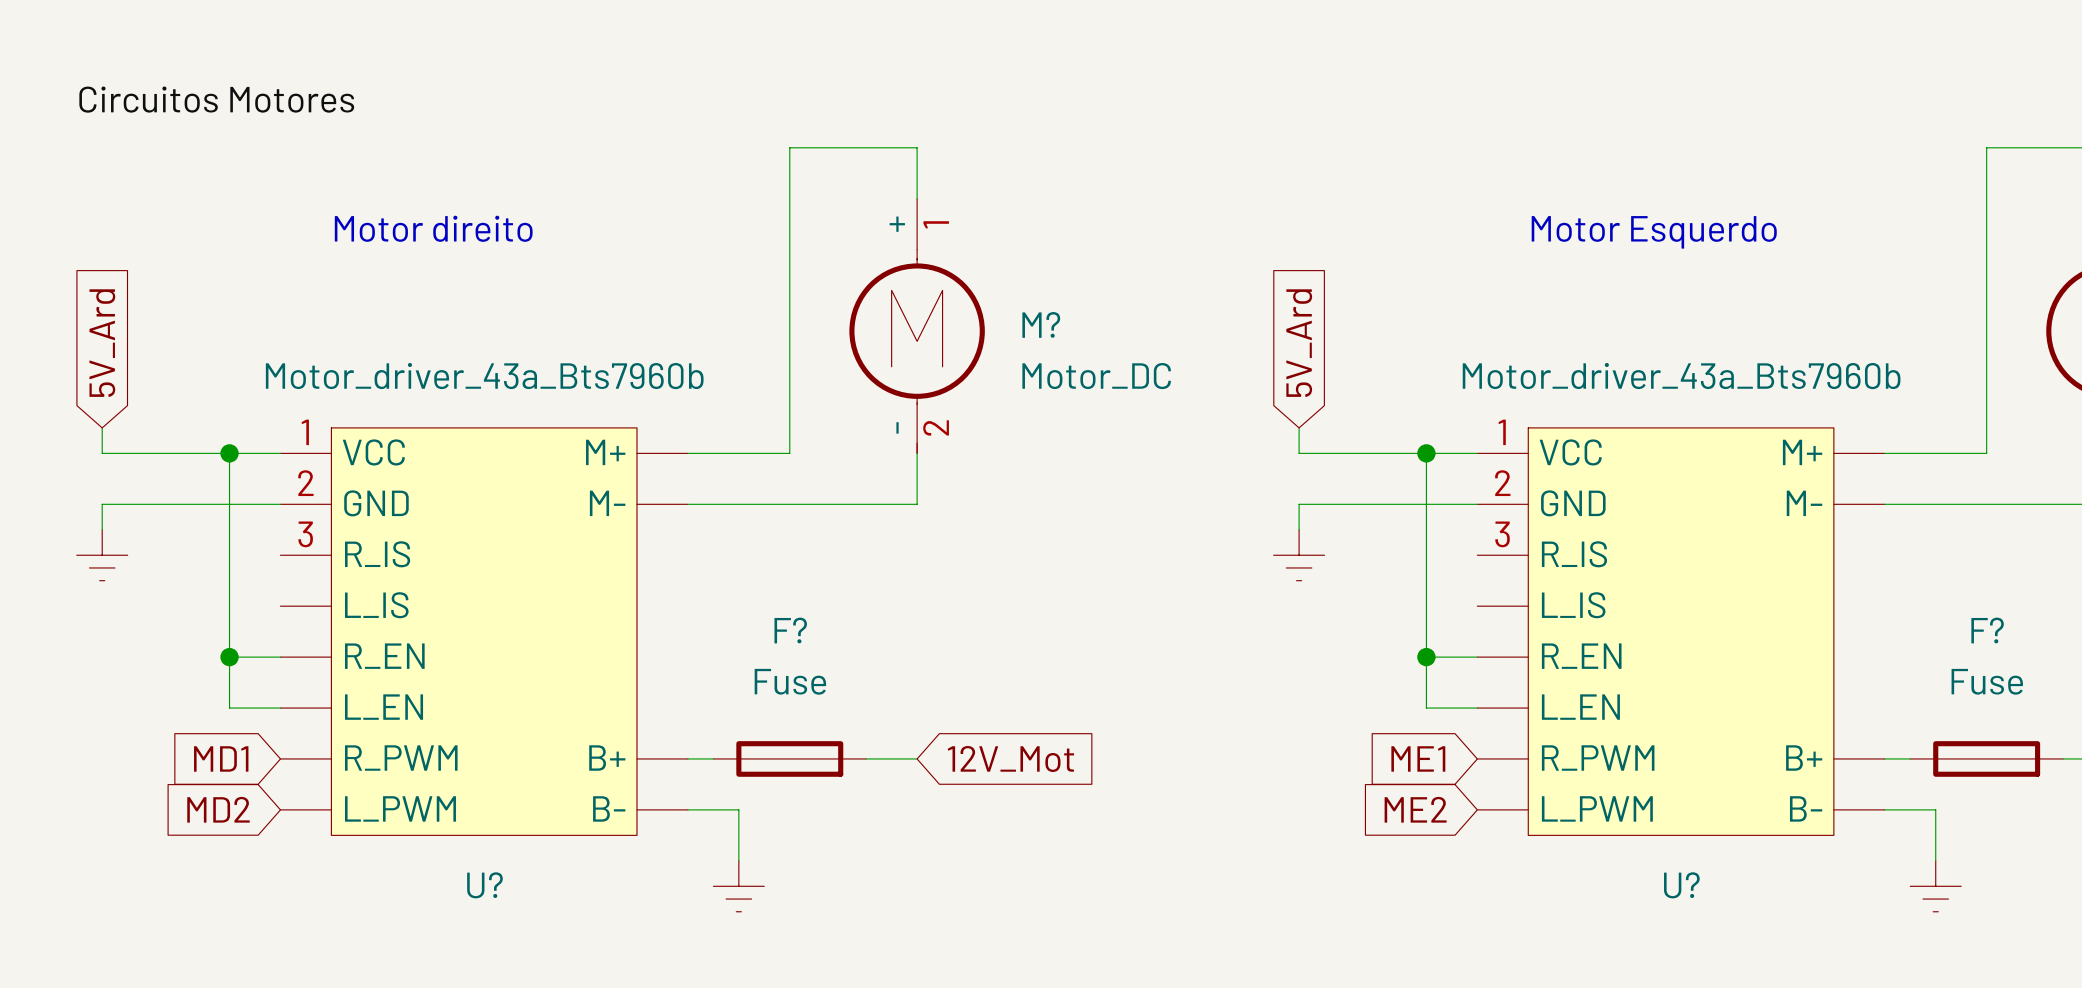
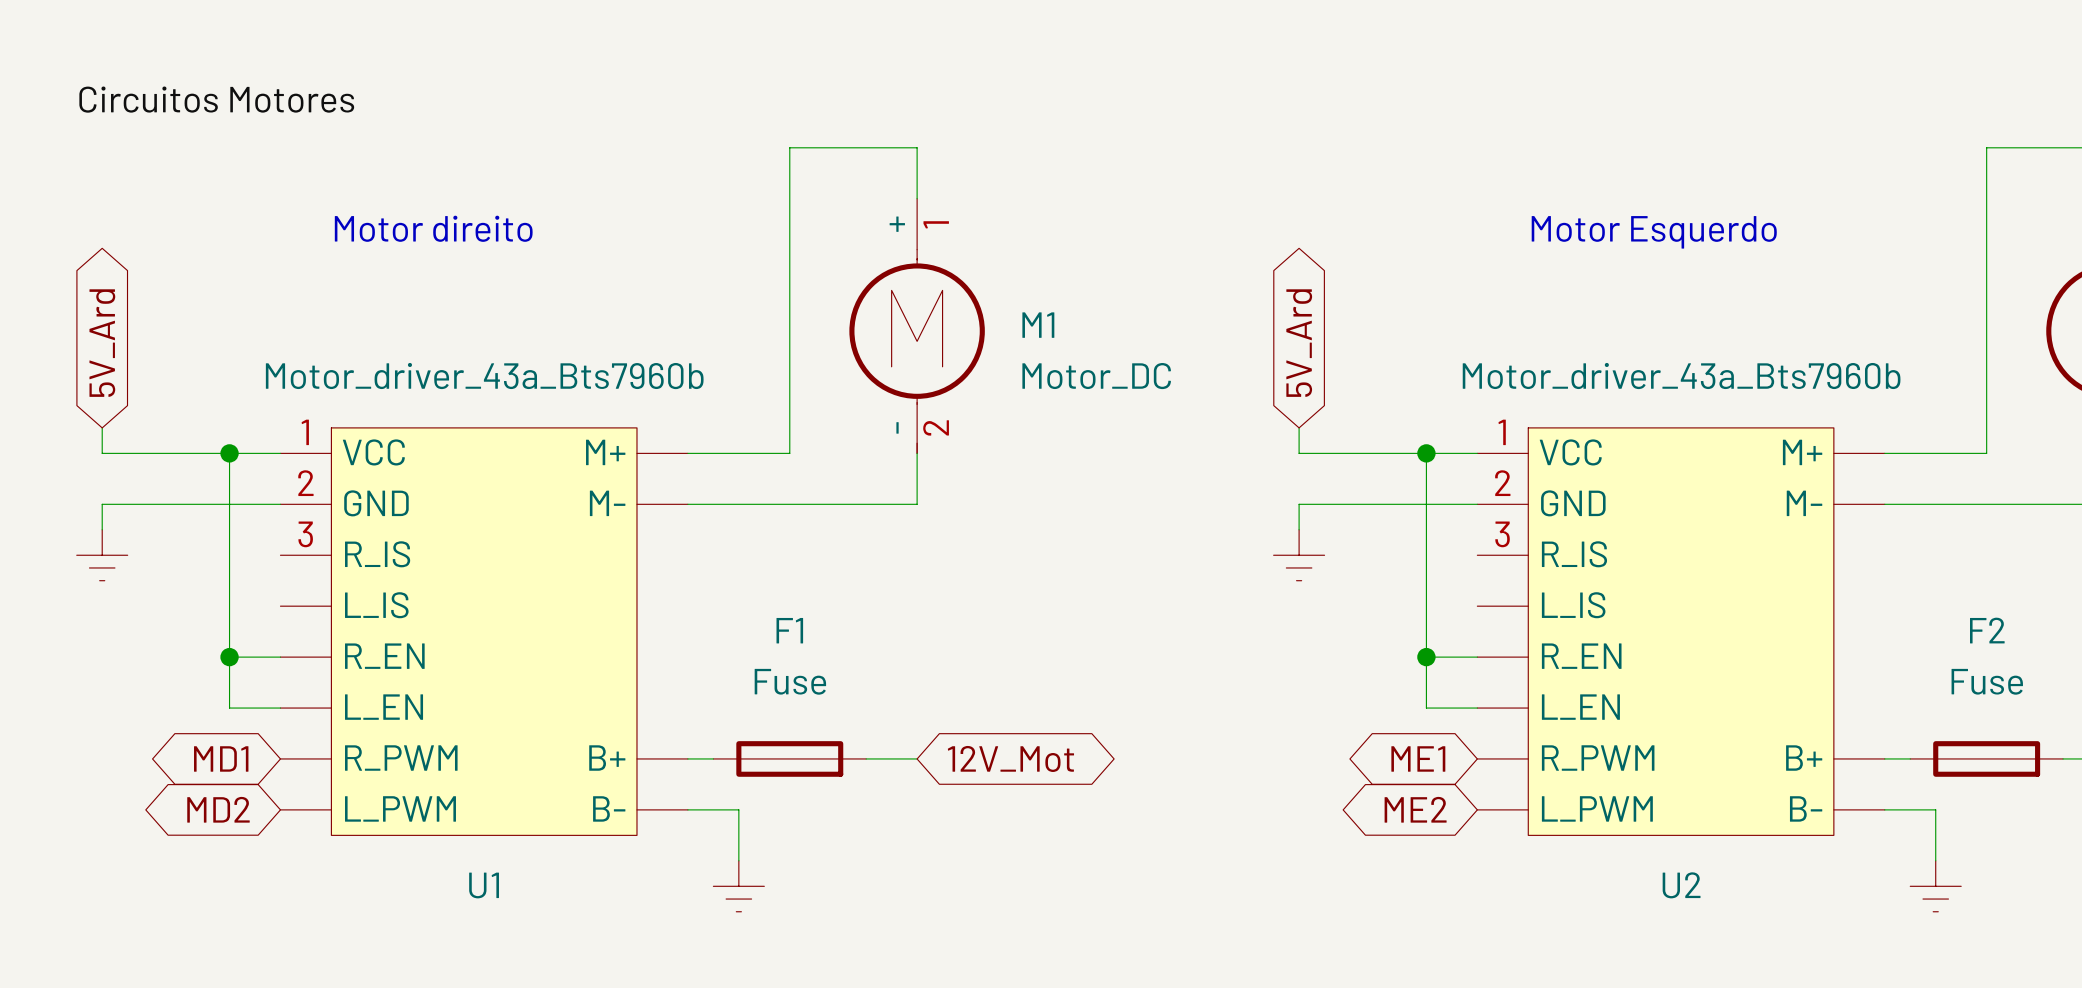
M? name: M? (1041, 324) -> M1 (1038, 325)
global label shape: input (102, 343) -> bidirectional (102, 343)
global label shape: input (1299, 343) -> bidirectional (1299, 343)
F? name: F? (790, 630) -> F1 (789, 630)
F? name: F? (1987, 630) -> F2 (1987, 630)
global label shape: input (221, 758) -> bidirectional (221, 758)
global label shape: input (1010, 758) -> bidirectional (1010, 758)
global label shape: input (1418, 758) -> bidirectional (1418, 758)
global label shape: input (218, 809) -> bidirectional (218, 809)
global label shape: input (1415, 809) -> bidirectional (1415, 809)
U? name: U? (484, 885) -> U1 (484, 885)
U? name: U? (1681, 885) -> U2 (1681, 885)

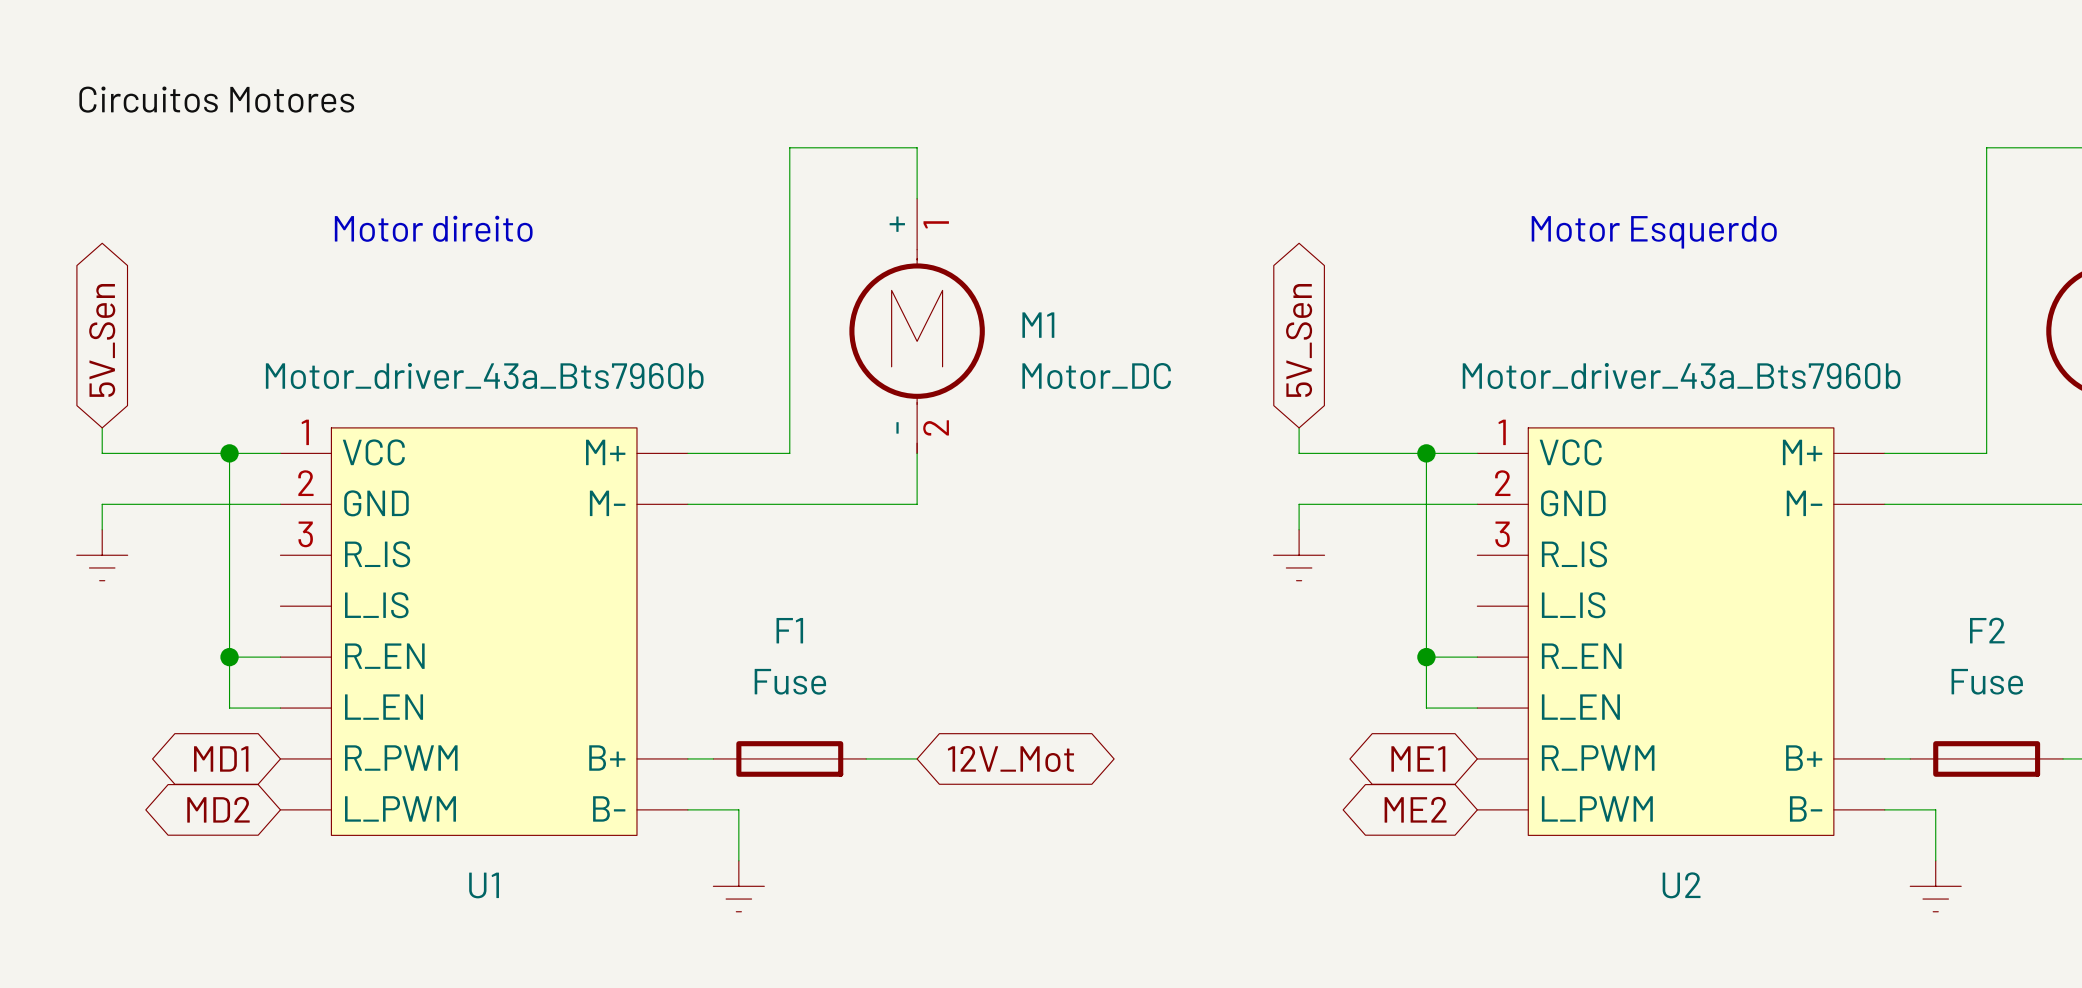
global label: 5V_Ard (102, 343) -> 5V_Sen (102, 340)
global label: 5V_Ard (1299, 343) -> 5V_Sen (1299, 340)

